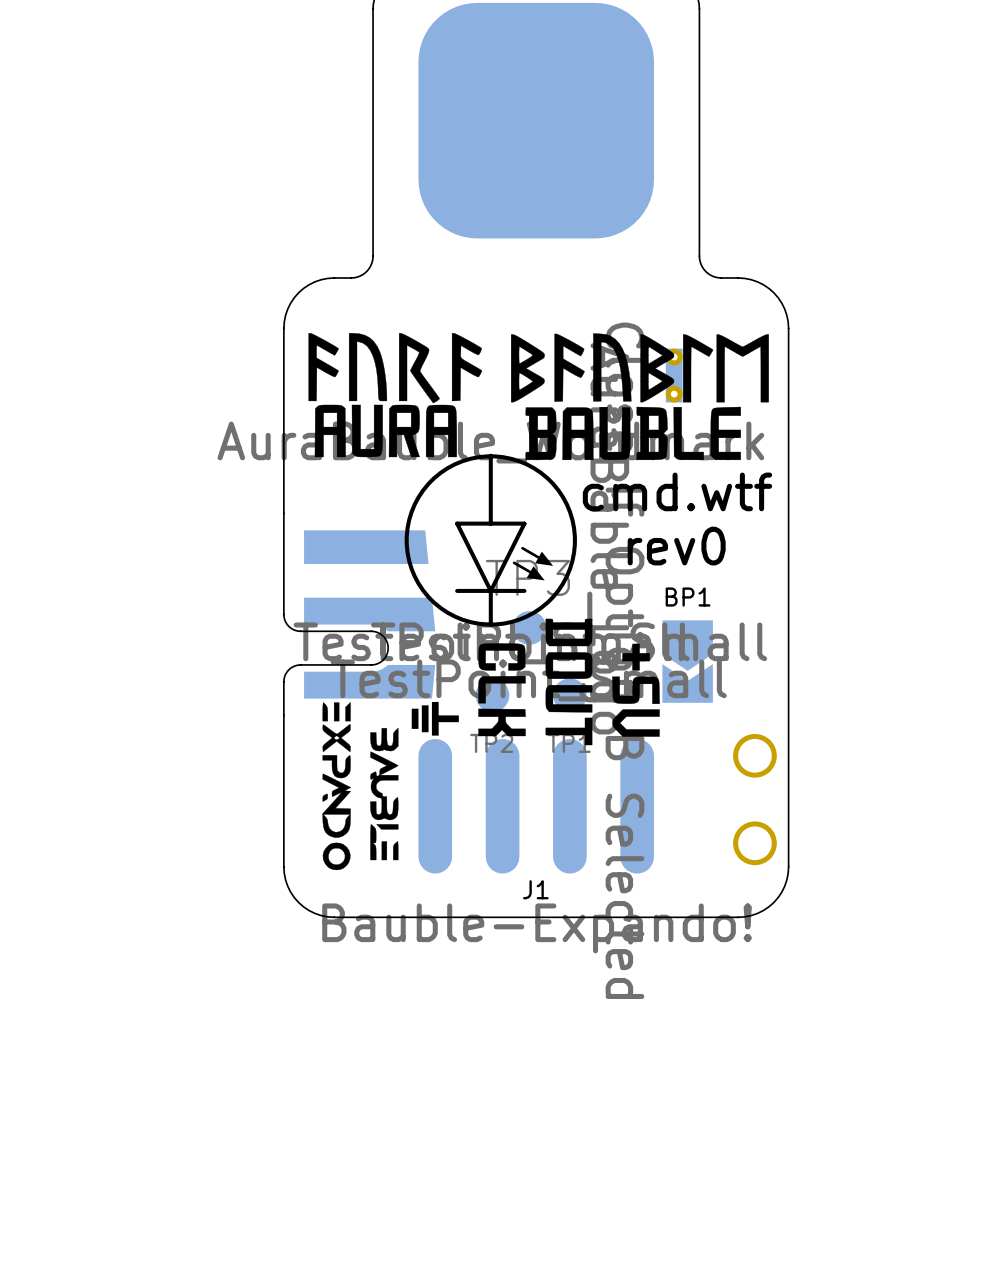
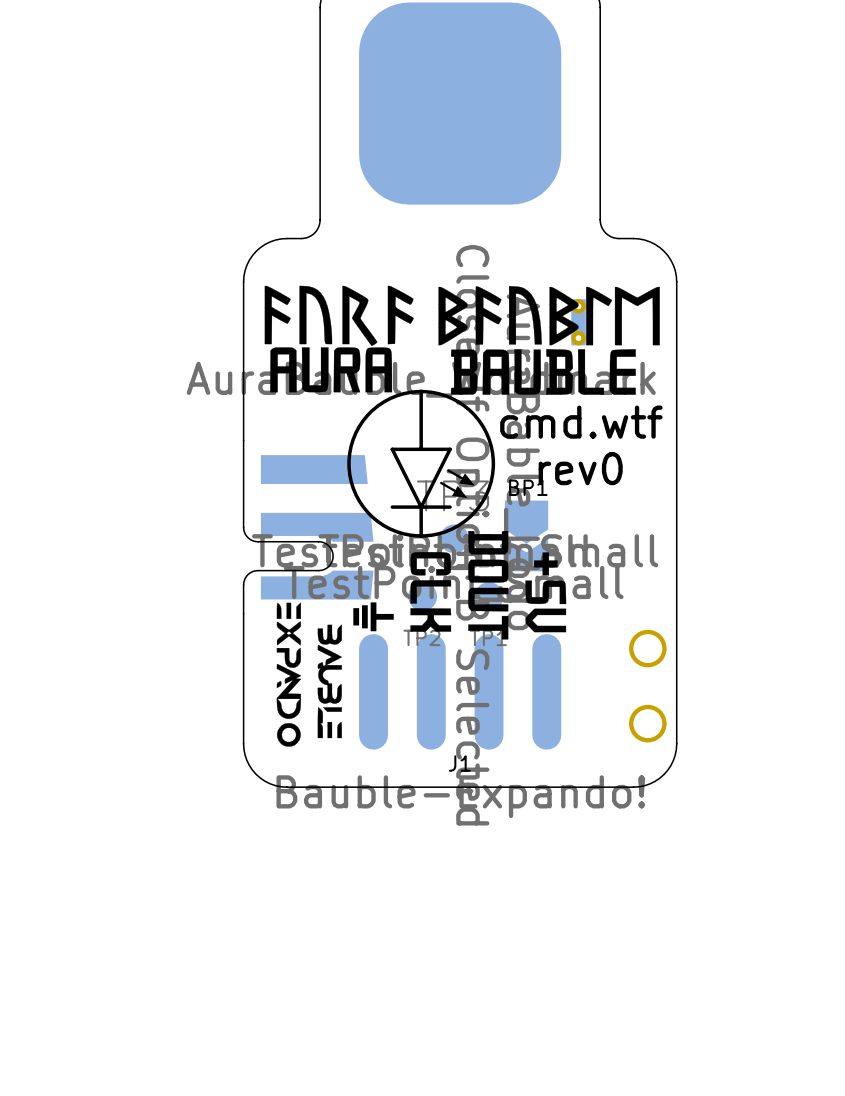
BP1 name position: BP1 (688, 597) -> BP1 (528, 487)
BP1 position: (687, 661) -> (526, 535)

